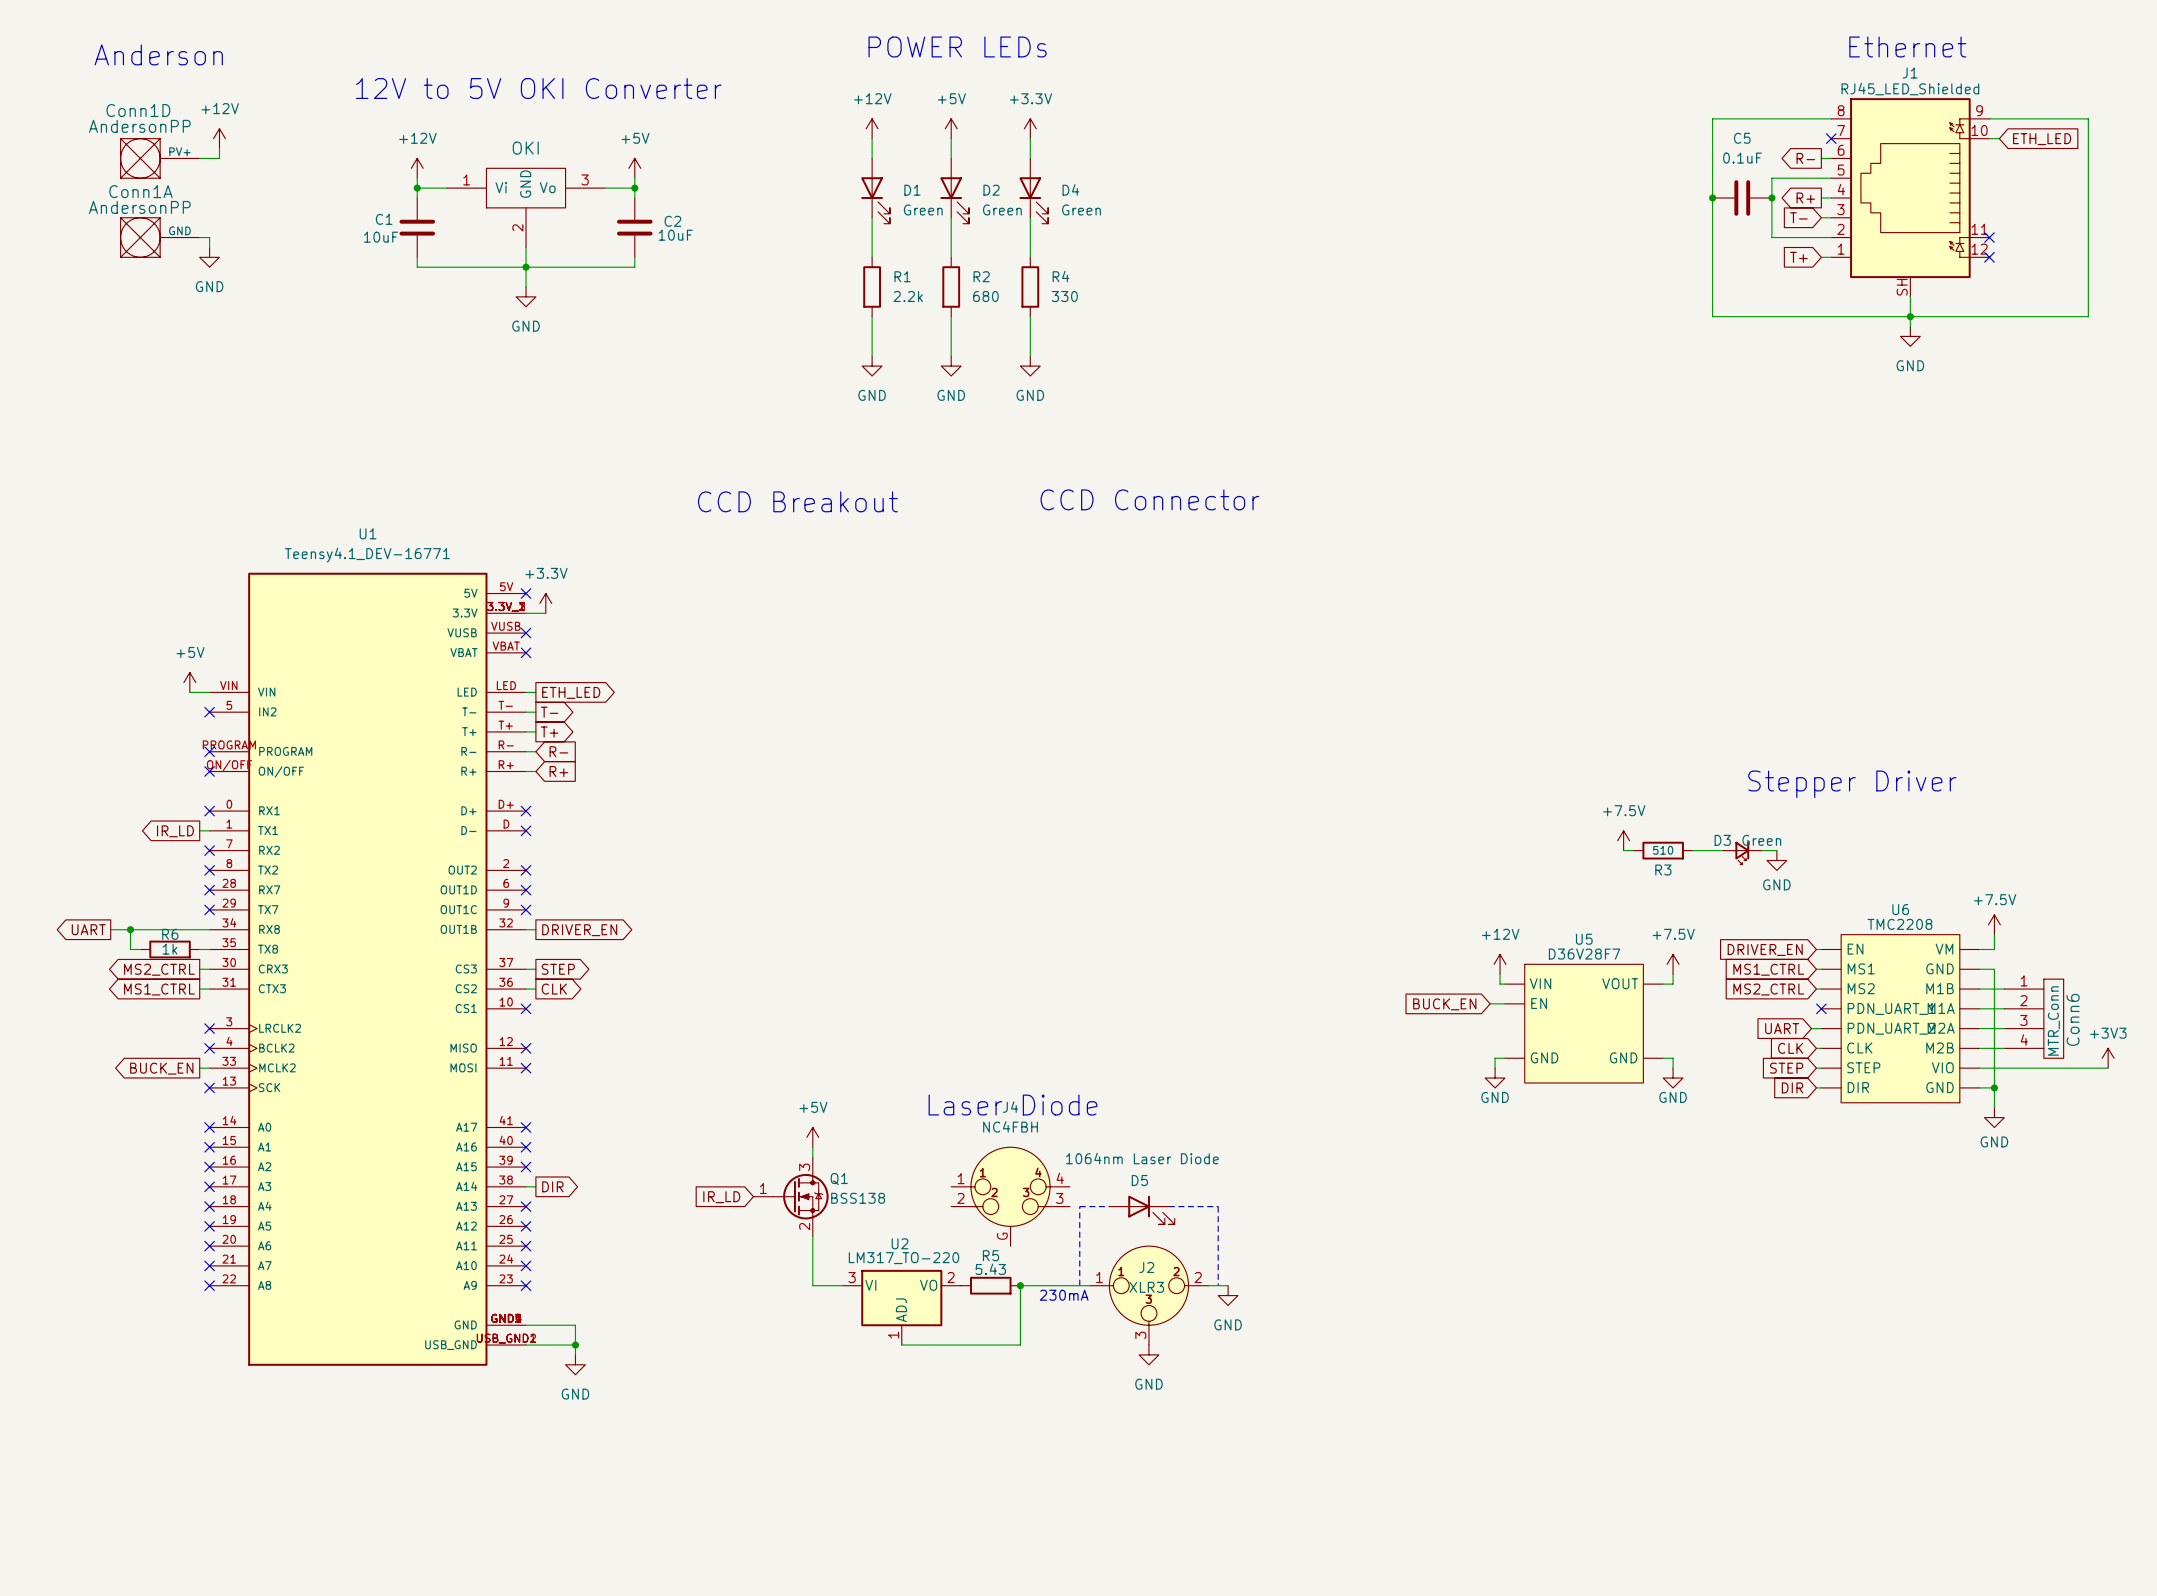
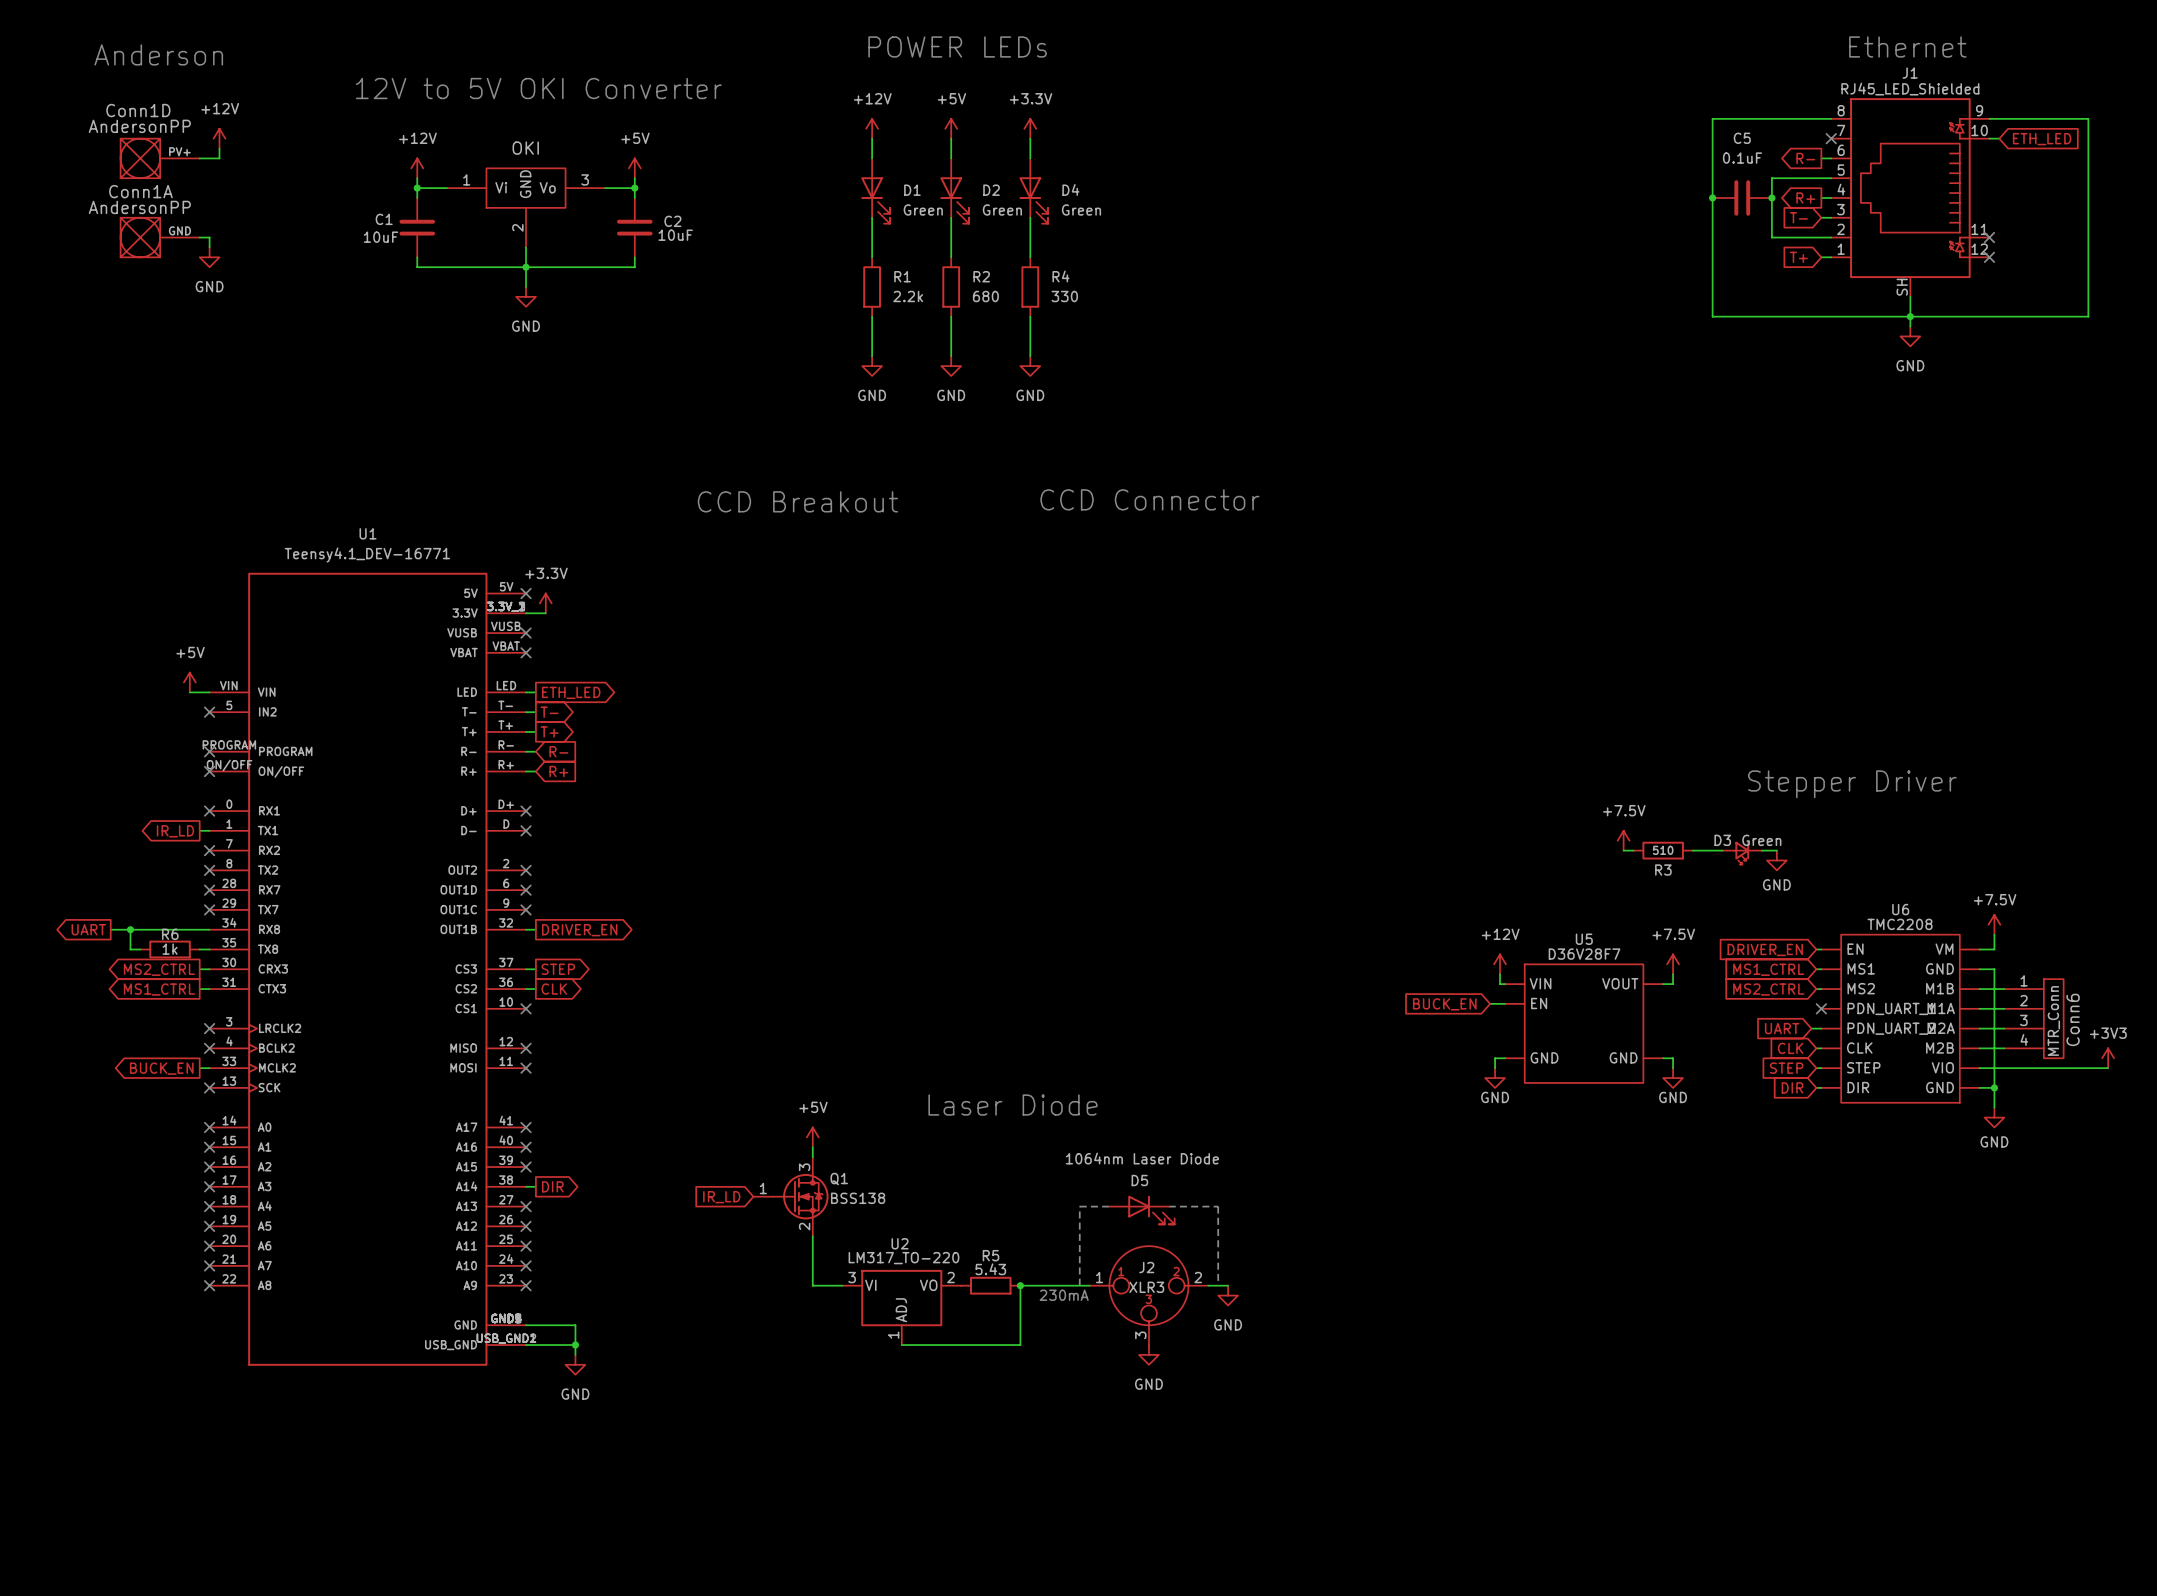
J4: NC4FBH (1010, 1196) -> none

